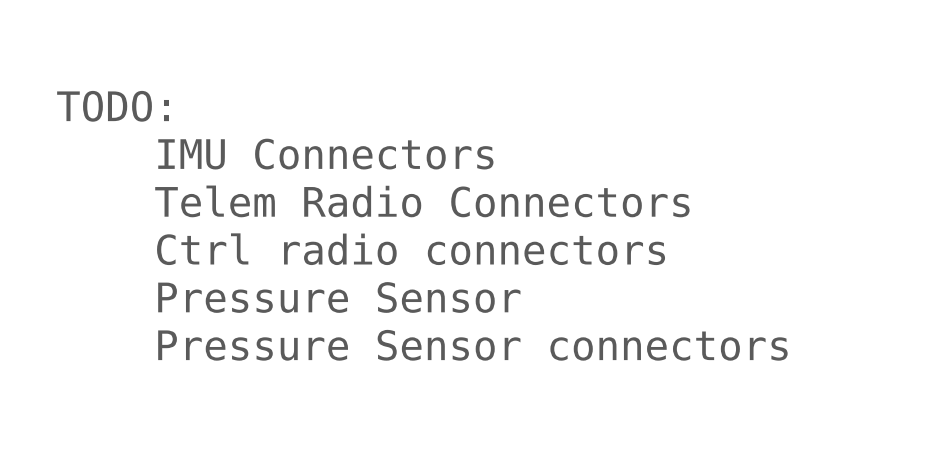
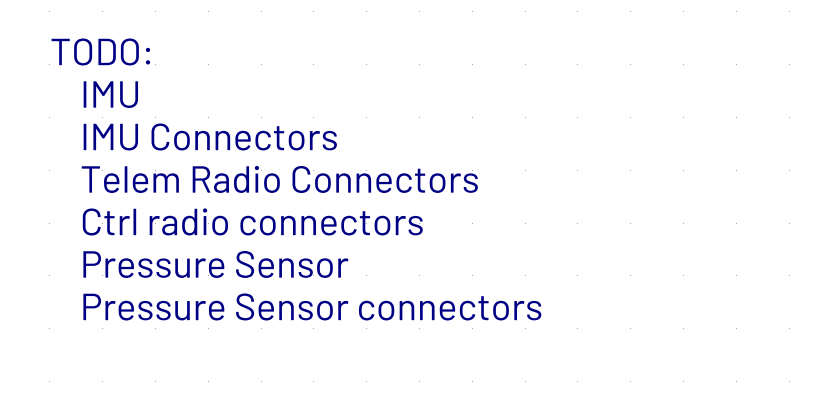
text: none -> TODO: (100, 51)
text: TODO: (113, 106) -> IMU (110, 94)

